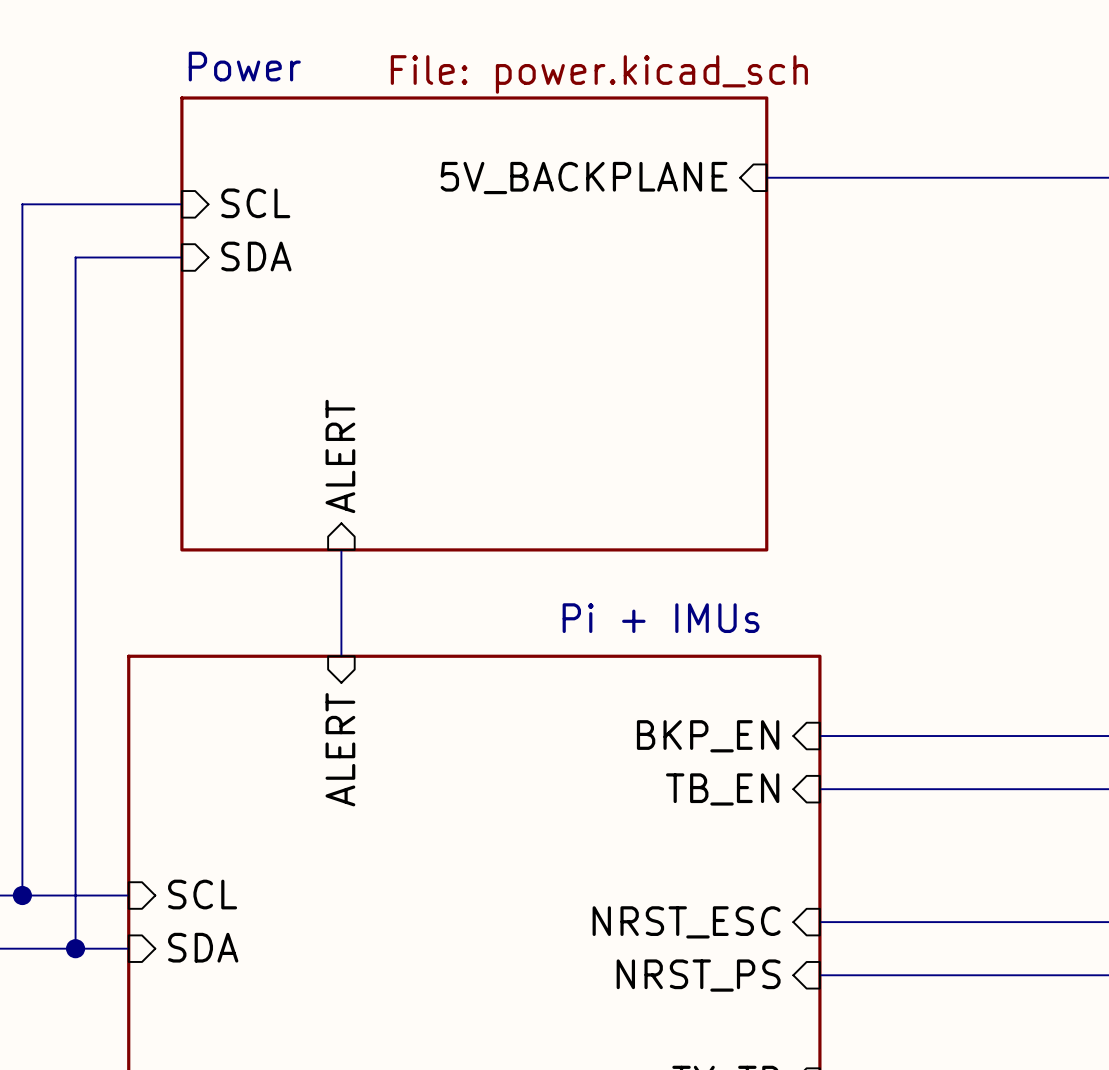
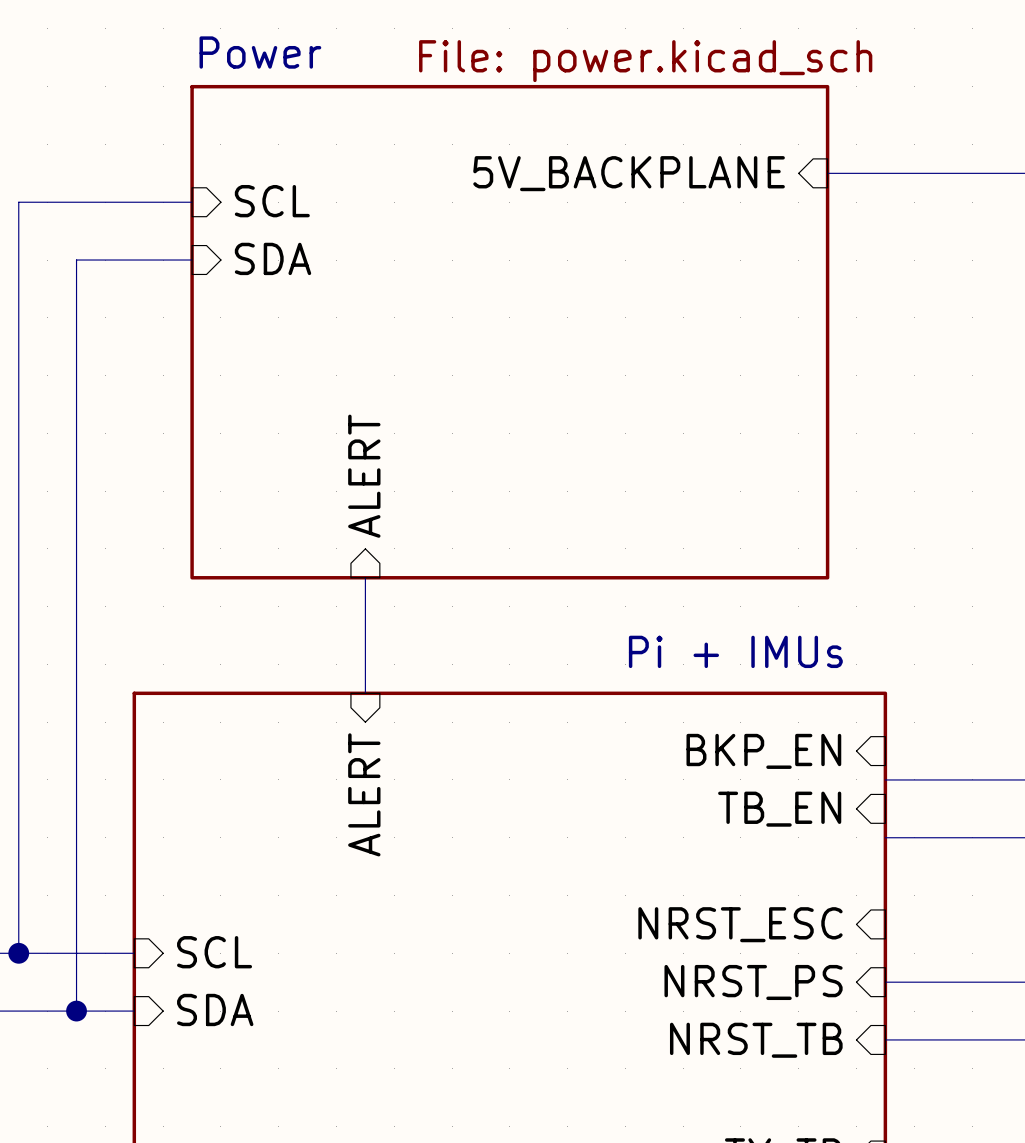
text position: Pi + IMUs (661, 618) -> Pi + IMUs (735, 651)
sheet pin position: BKP_EN (708, 736) -> BKP_EN (763, 751)
sheet pin position: TB_EN (722, 789) -> TB_EN (779, 809)
sheet pin: none -> NRST_ESC (740, 924)
sheet pin: NRST_ESC (686, 922) -> NRST_PS (753, 982)
sheet pin: NRST_PS (698, 975) -> NRST_TB (756, 1040)

